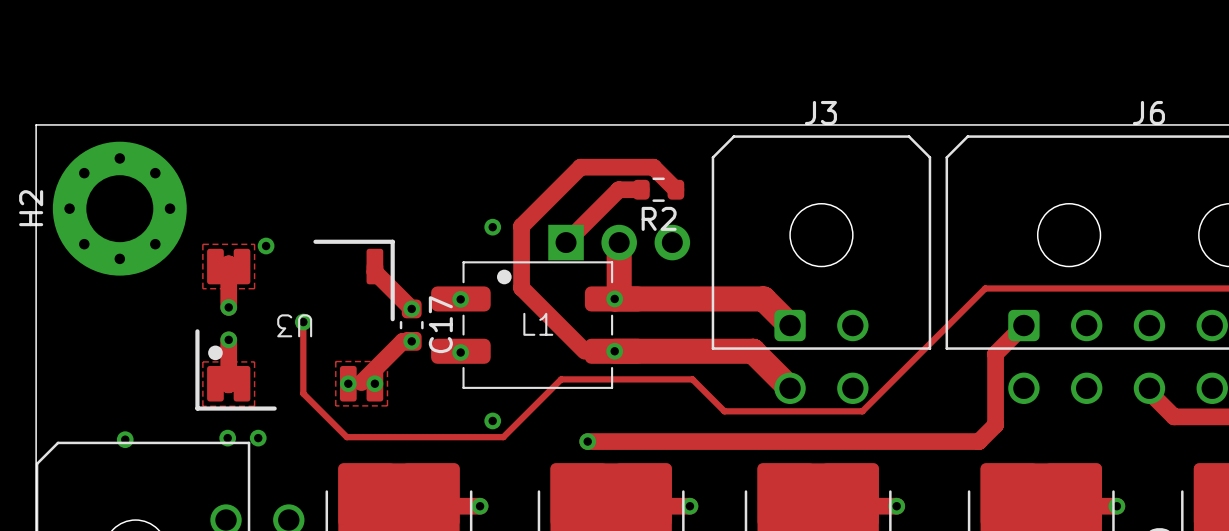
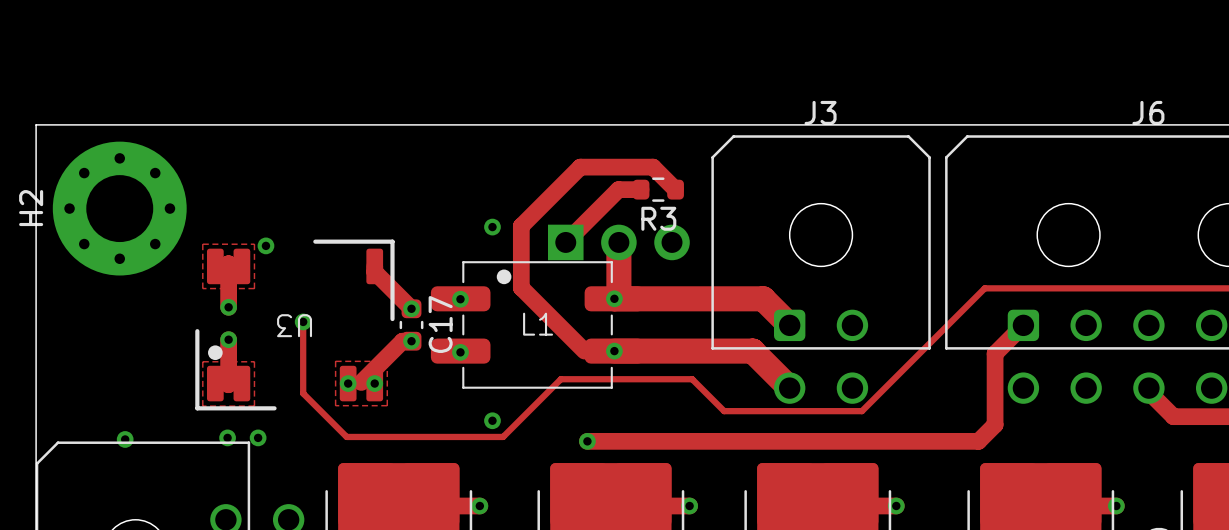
R2 name: R2 (659, 218) -> R3 (658, 218)

